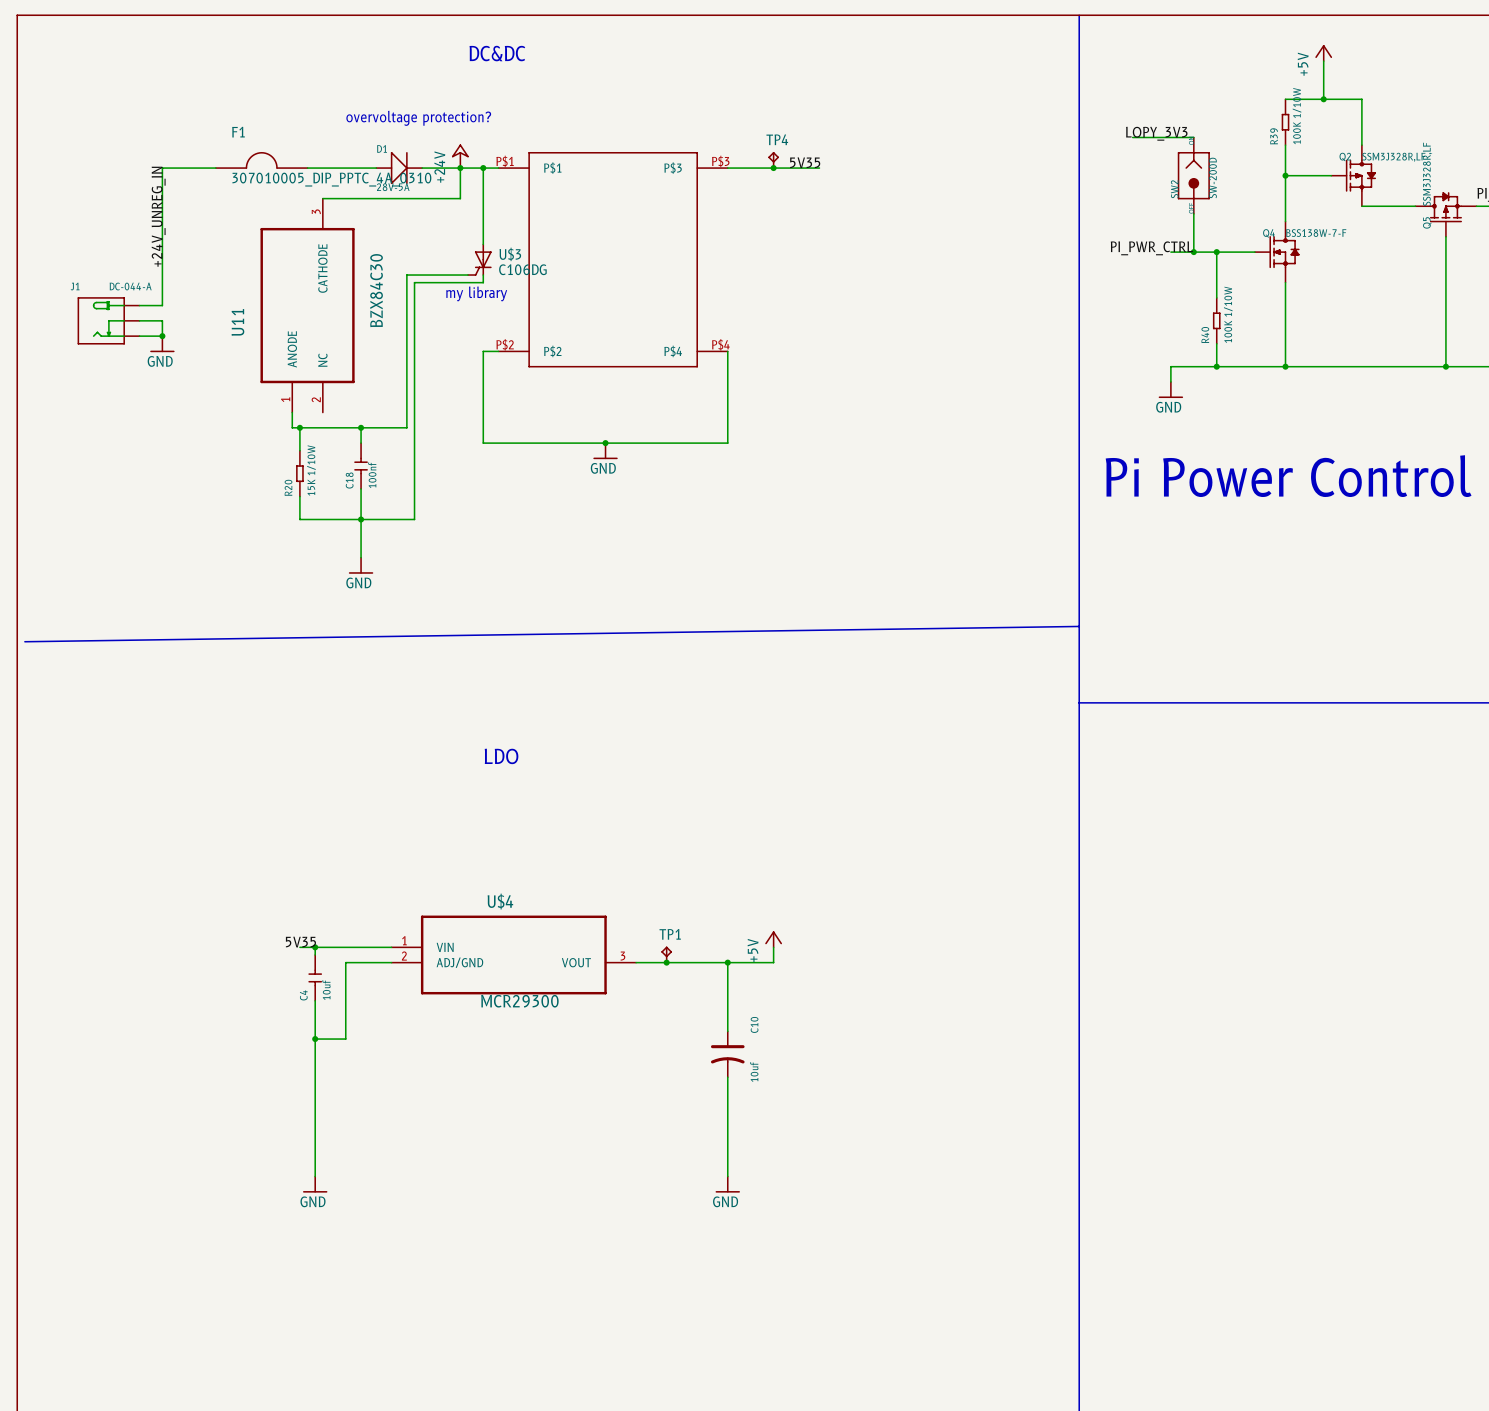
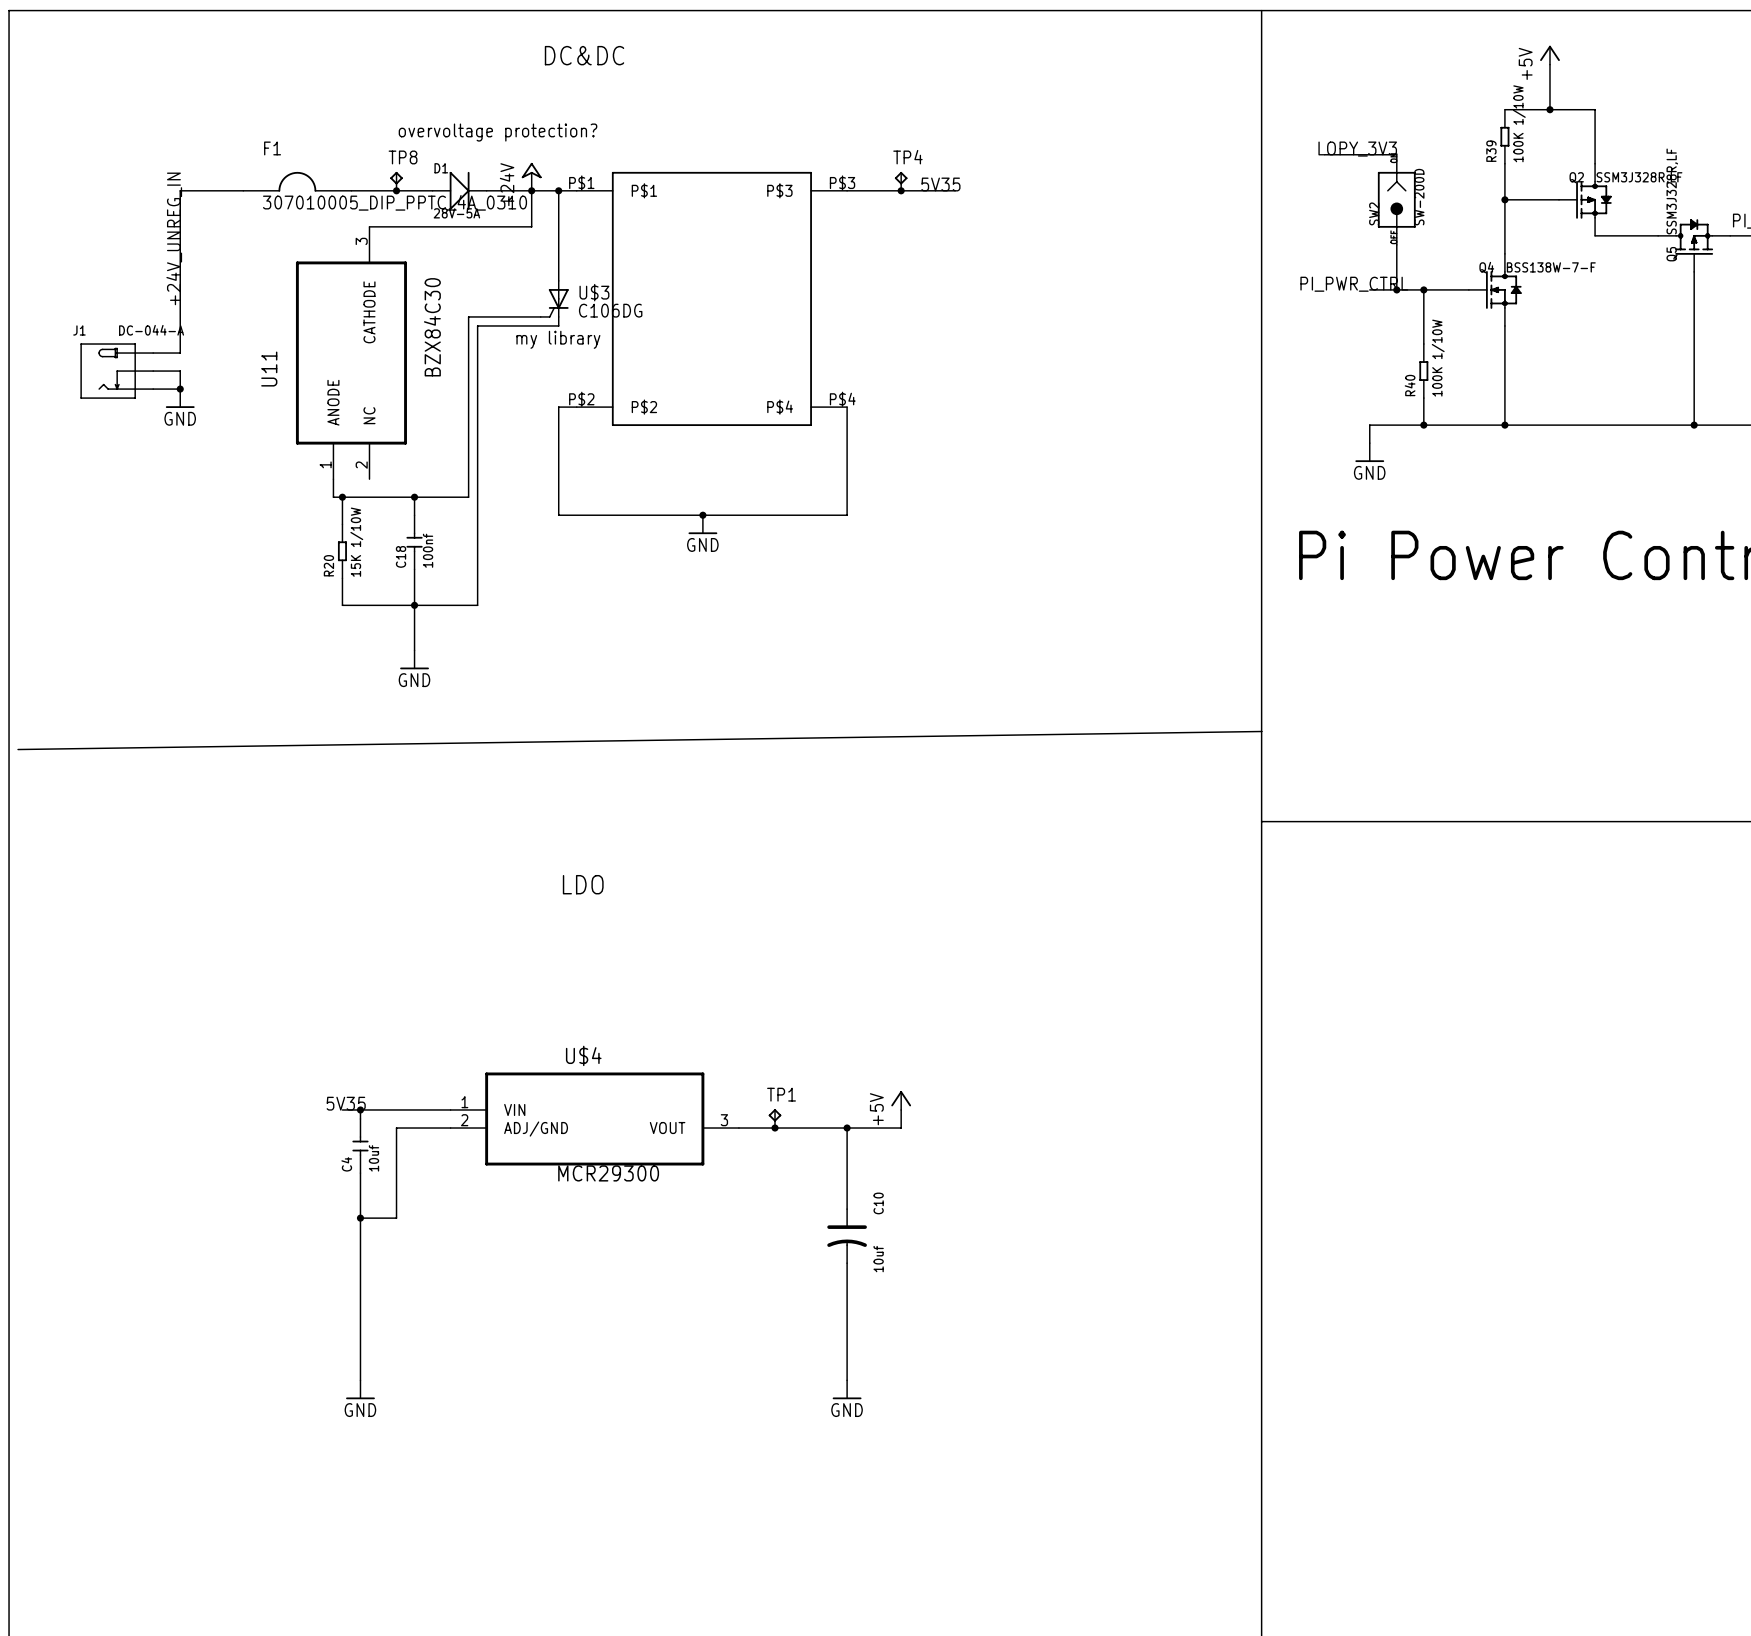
TP8: none -> (396, 181)
junction: none -> (396, 190)

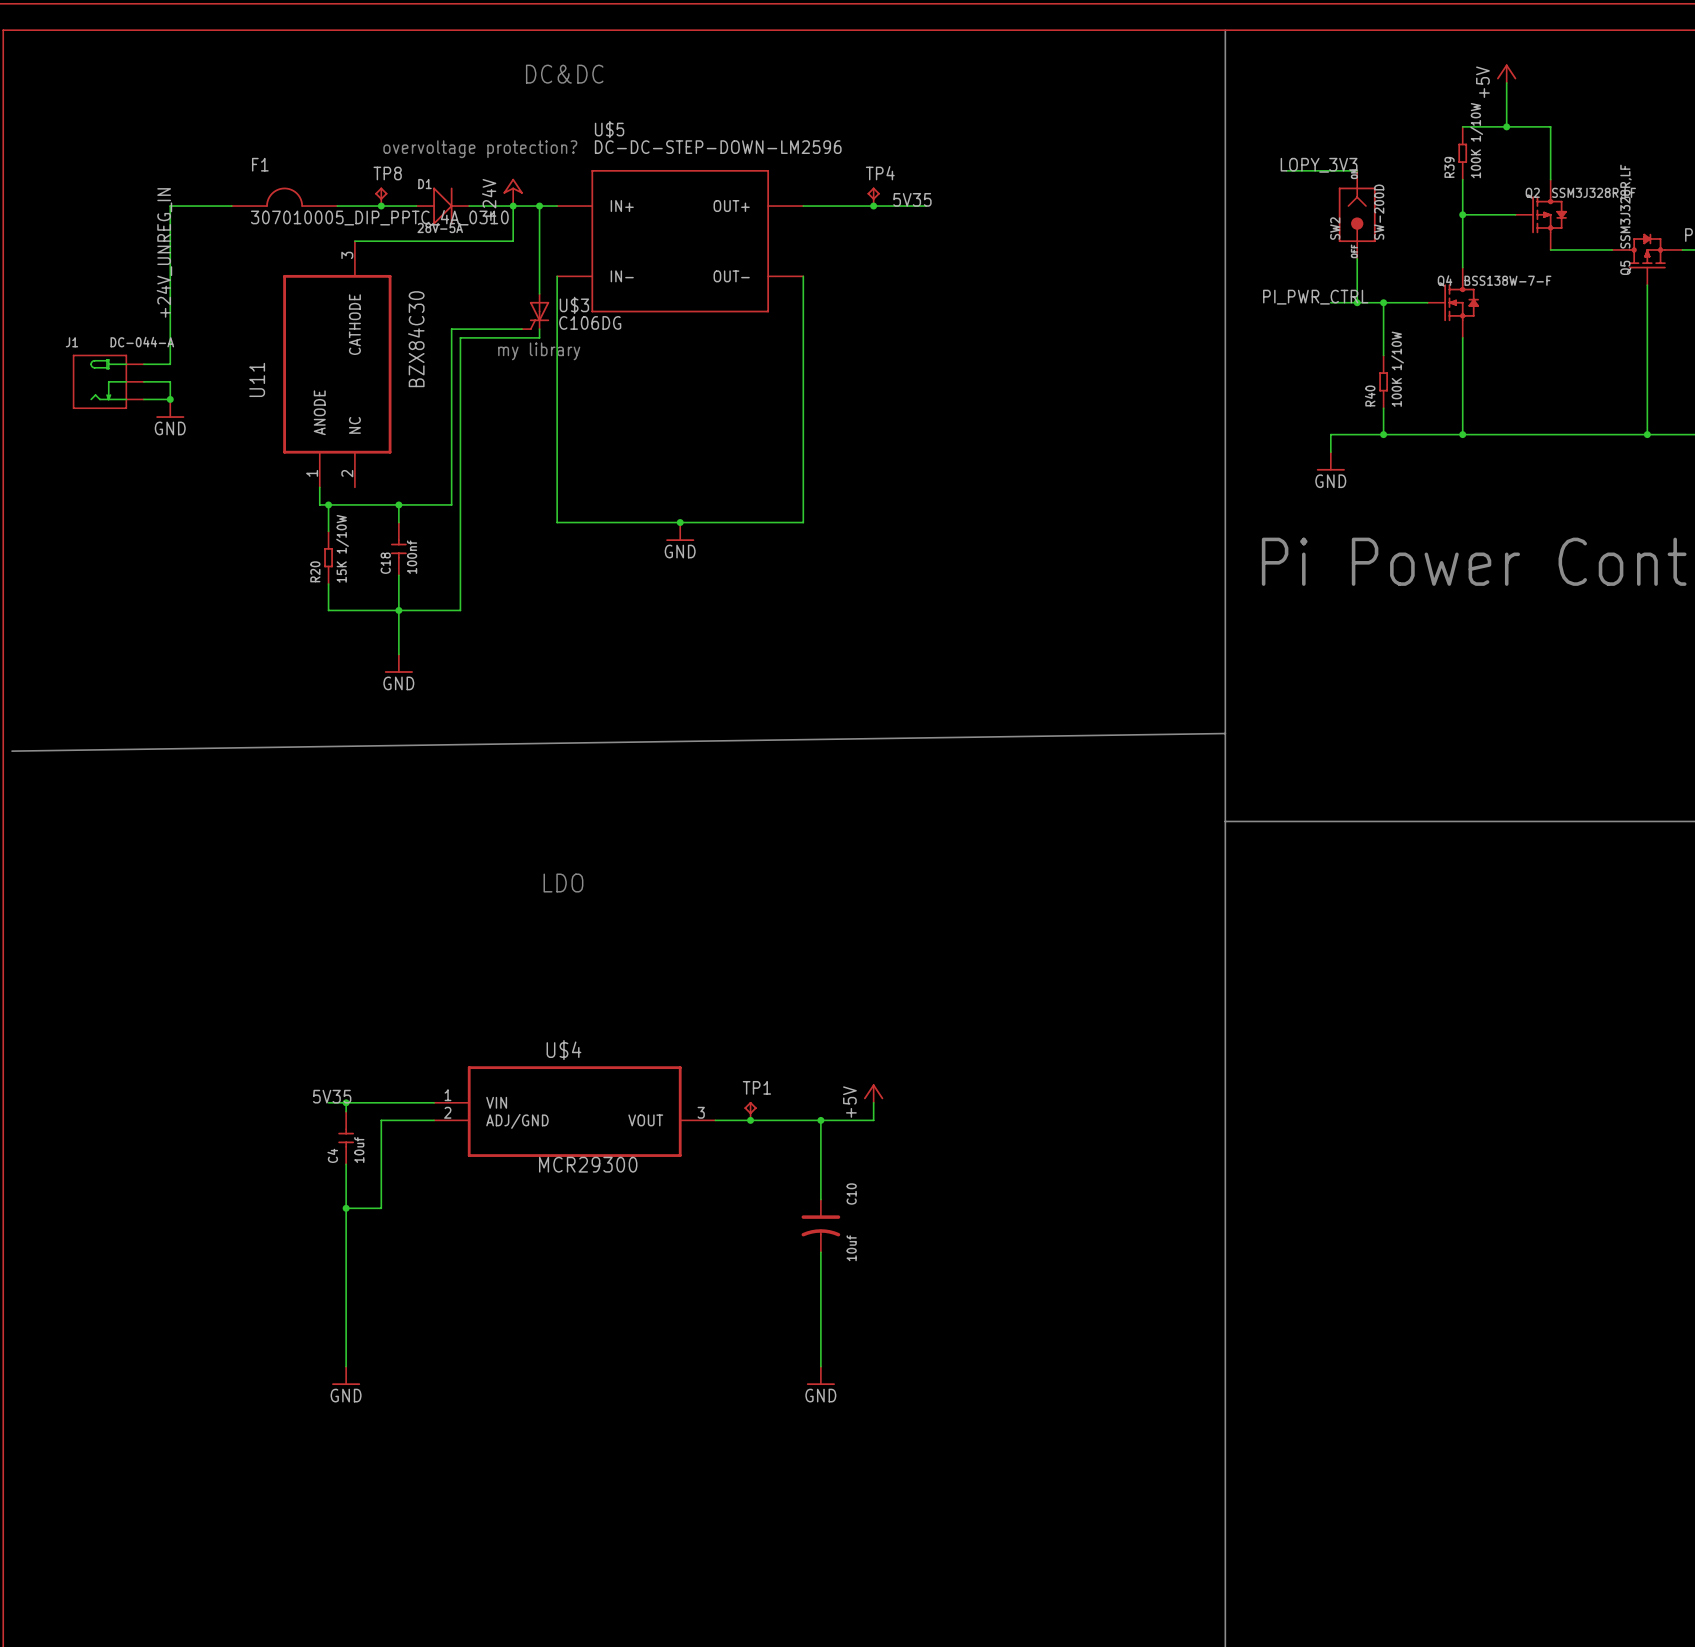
U$5: none -> DC-DC-STEP-DOWN-LM2596 (680, 241)
part: (711, 298) -> none
wire: (576, 407) (558, 407) (558, 515) (576, 515) -> (557, 276) (557, 522)
wire: (847, 407) (847, 515) (829, 515) -> (803, 276) (803, 522)

